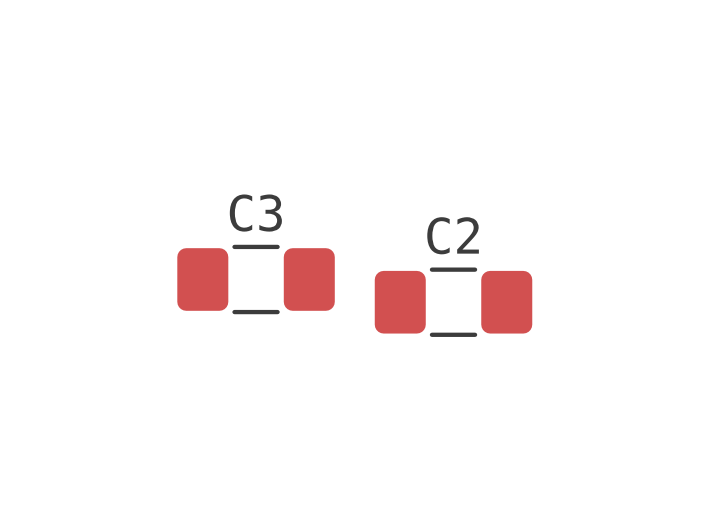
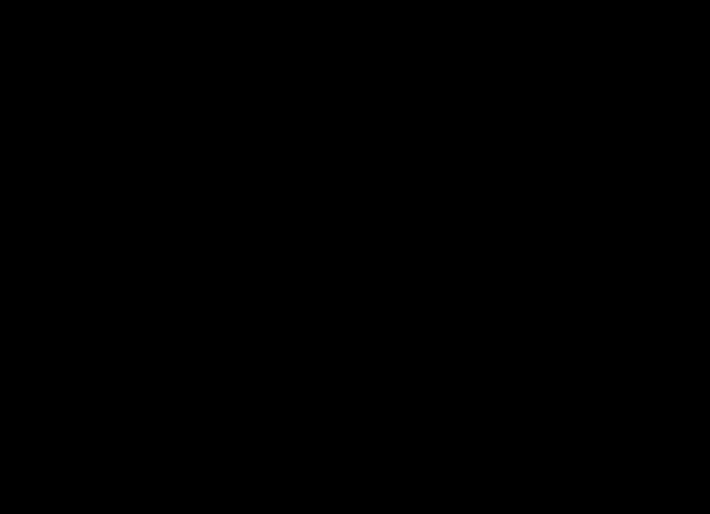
C3: (256, 279) -> none
C2: (453, 302) -> none

